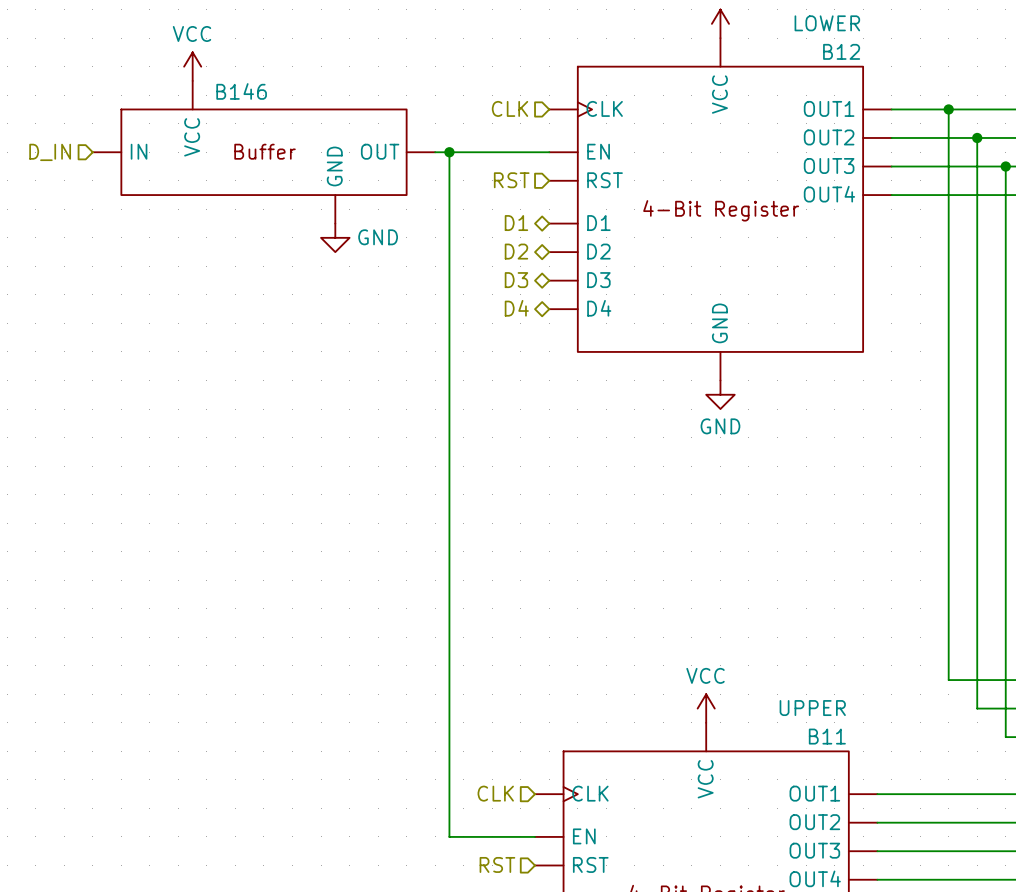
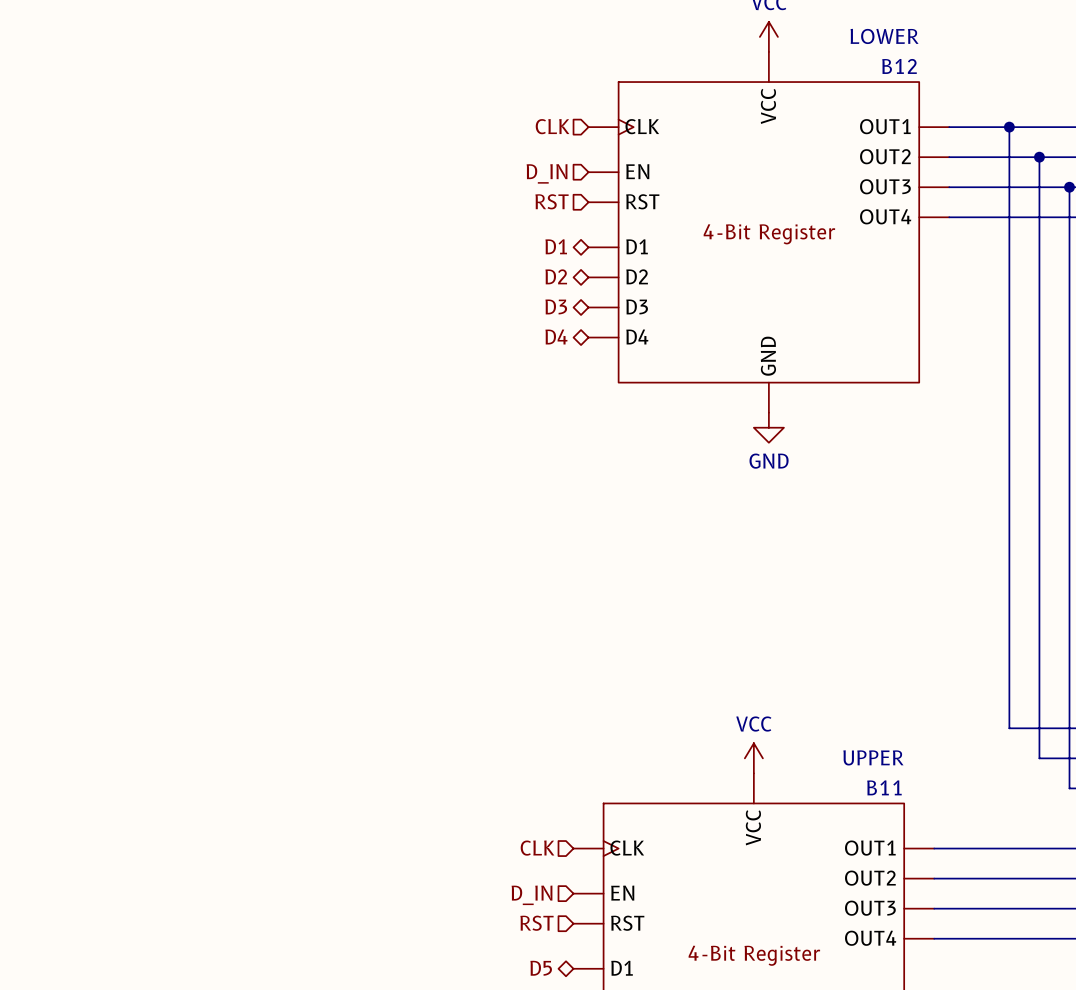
power symbol: VCC (192, 66) -> none
hierarchical label: D_IN (50, 152) -> none
B146: (263, 152) -> none
wire: (435, 152) (549, 152) -> none
wire: (449, 152) (449, 836) (535, 836) -> none
junction: (449, 152) -> none
hierarchical label: none -> D_IN (547, 173)
power symbol: GND (335, 237) -> none
hierarchical label: none -> D_IN (532, 895)

